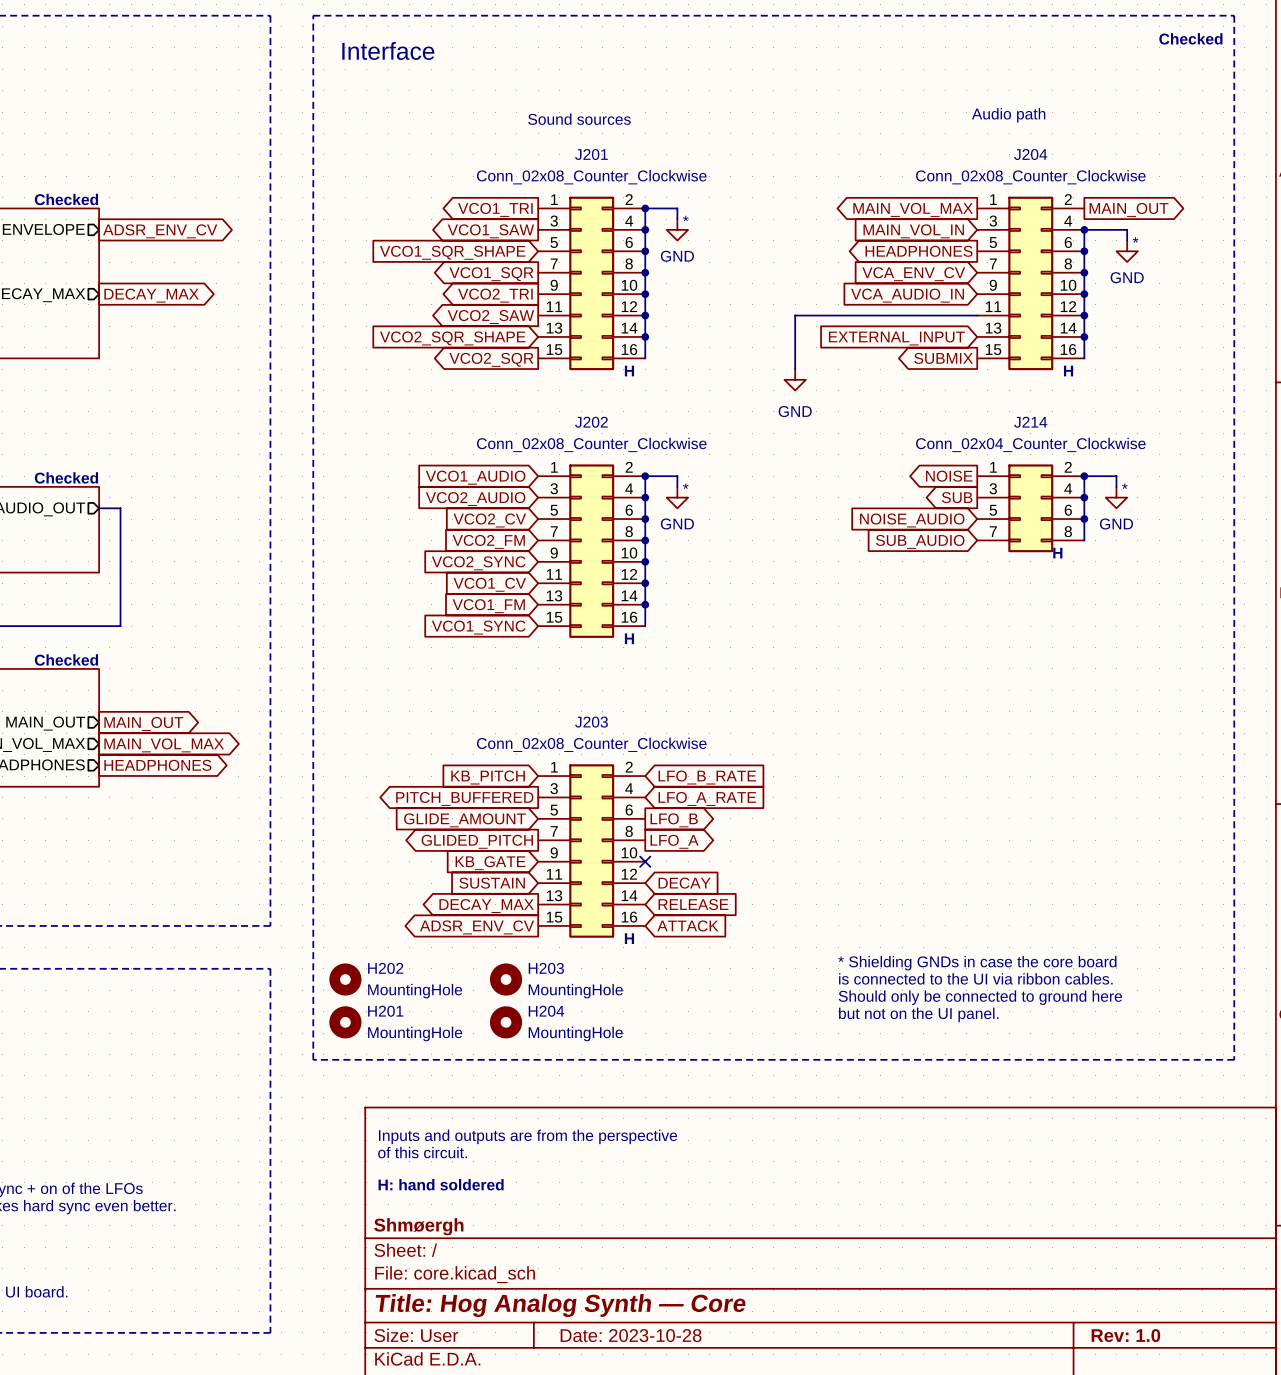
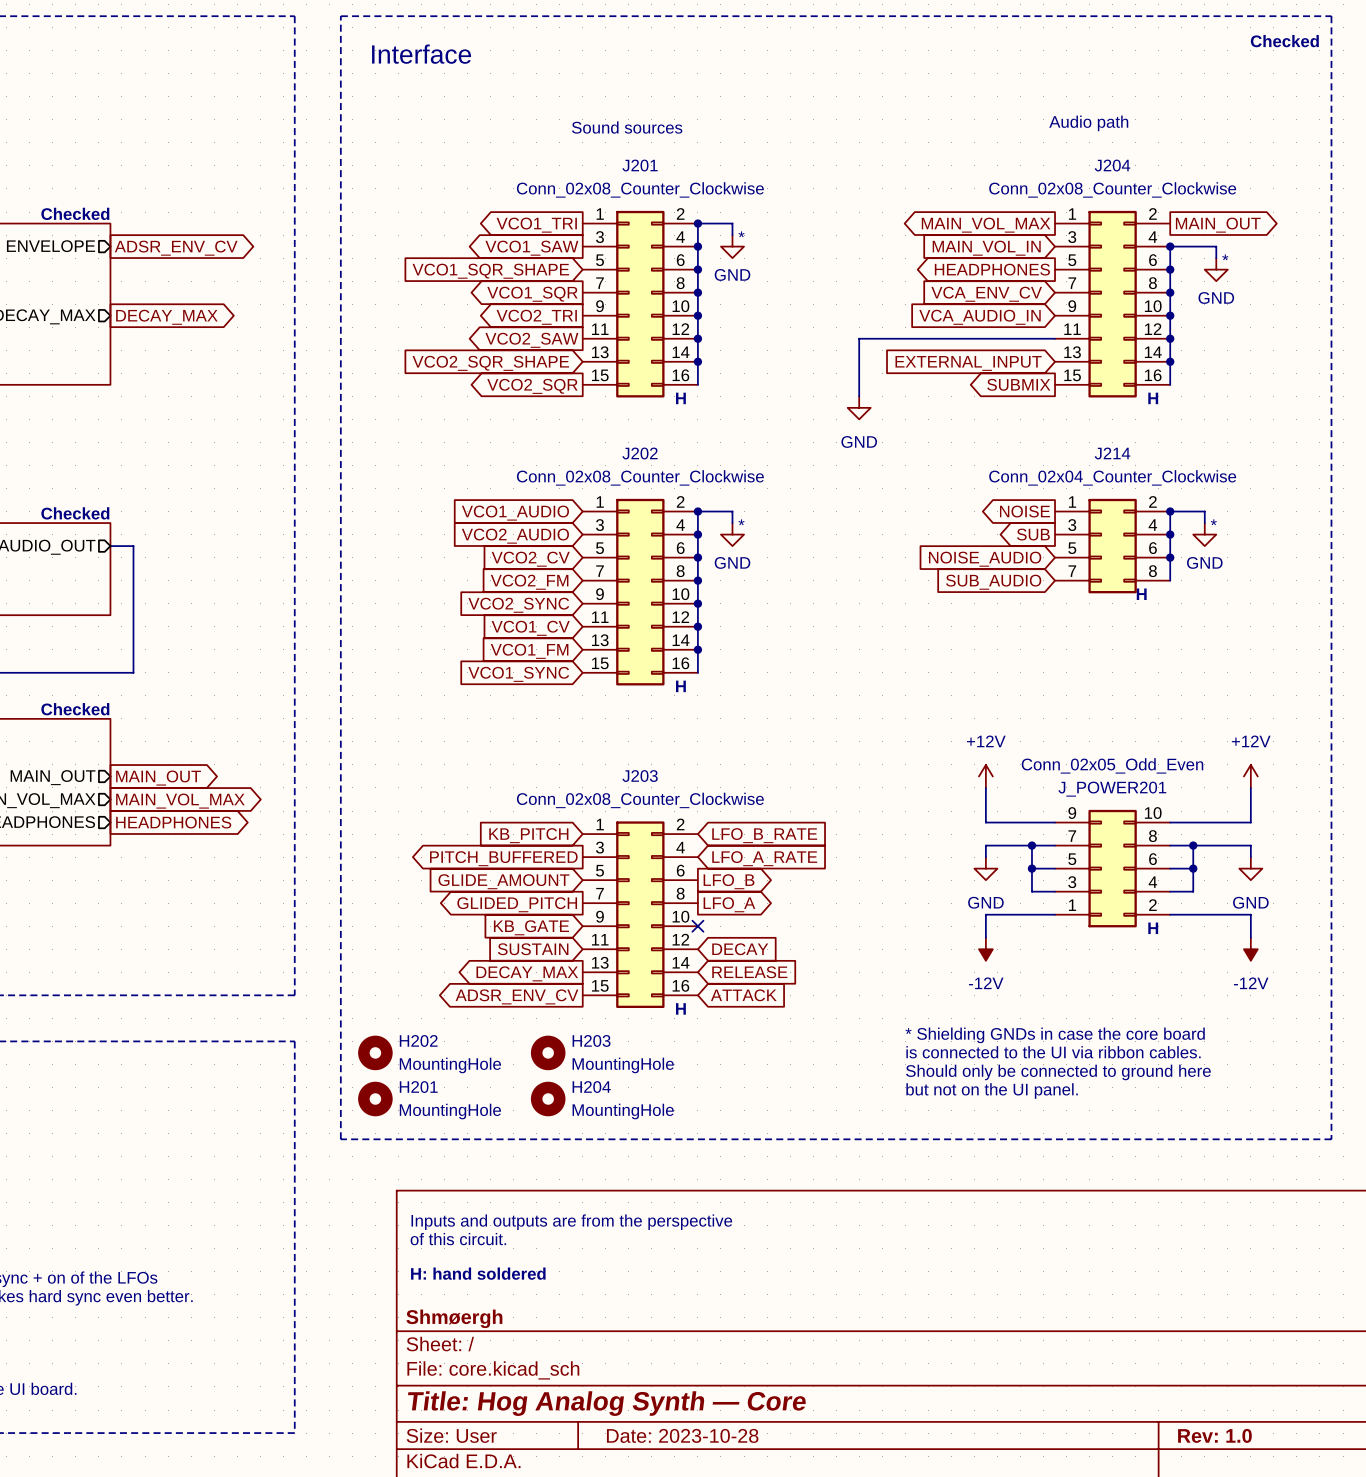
power symbol: none -> +12V (985, 776)
power symbol: none -> +12V (1250, 776)
wire: none -> (985, 787) (985, 822) (1055, 822)
wire: none -> (1250, 787) (1250, 822) (1170, 822)
wire: none -> (1031, 845) (1031, 891) (1055, 891)
junction: none -> (1031, 845)
wire: none -> (1055, 845) (985, 845) (985, 857)
wire: none -> (1170, 845) (1250, 845) (1250, 857)
wire: none -> (1193, 845) (1193, 891) (1170, 891)
junction: none -> (1193, 845)
power symbol: none -> GND (985, 868)
wire: none -> (1031, 868) (1055, 868)
junction: none -> (1031, 868)
J_POWER201: none -> Conn_02x05_Odd_Even (1112, 868)
wire: none -> (1170, 868) (1193, 868)
junction: none -> (1193, 868)
power symbol: none -> GND (1250, 868)
wire: none -> (1055, 914) (985, 914) (985, 937)
wire: none -> (1170, 914) (1250, 914) (1250, 937)
text: none -> H (1153, 928)
power symbol: none -> -12V (985, 949)
power symbol: none -> -12V (1250, 949)

